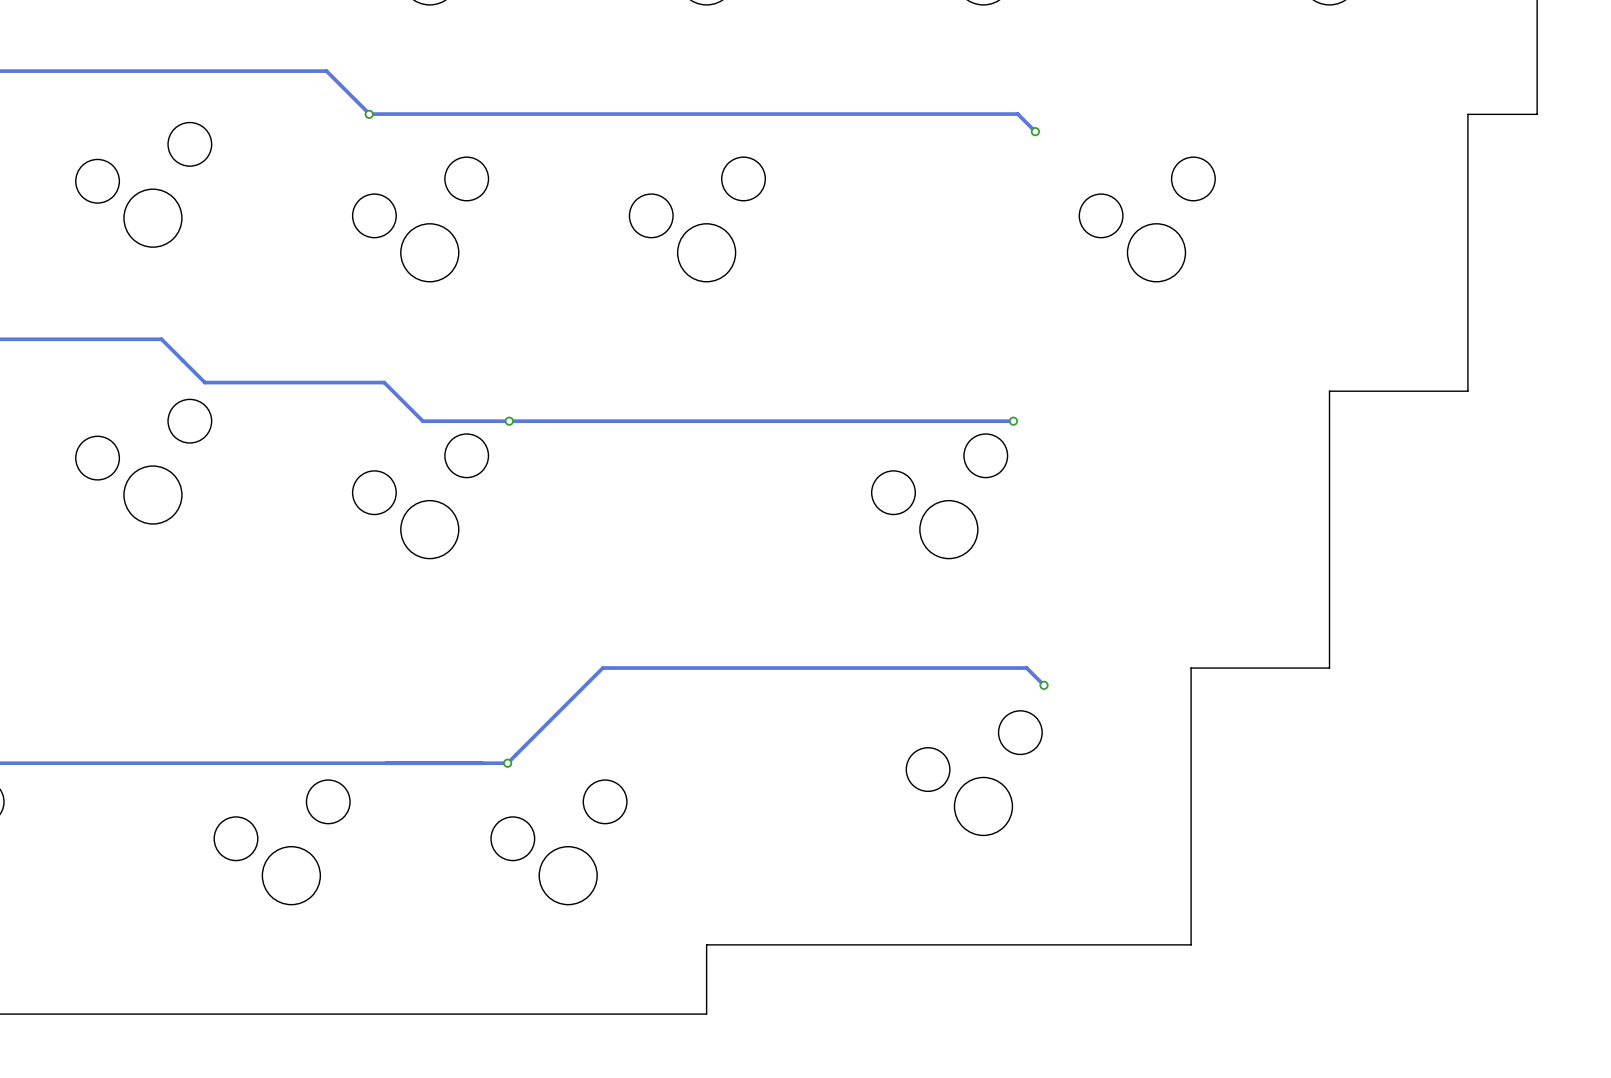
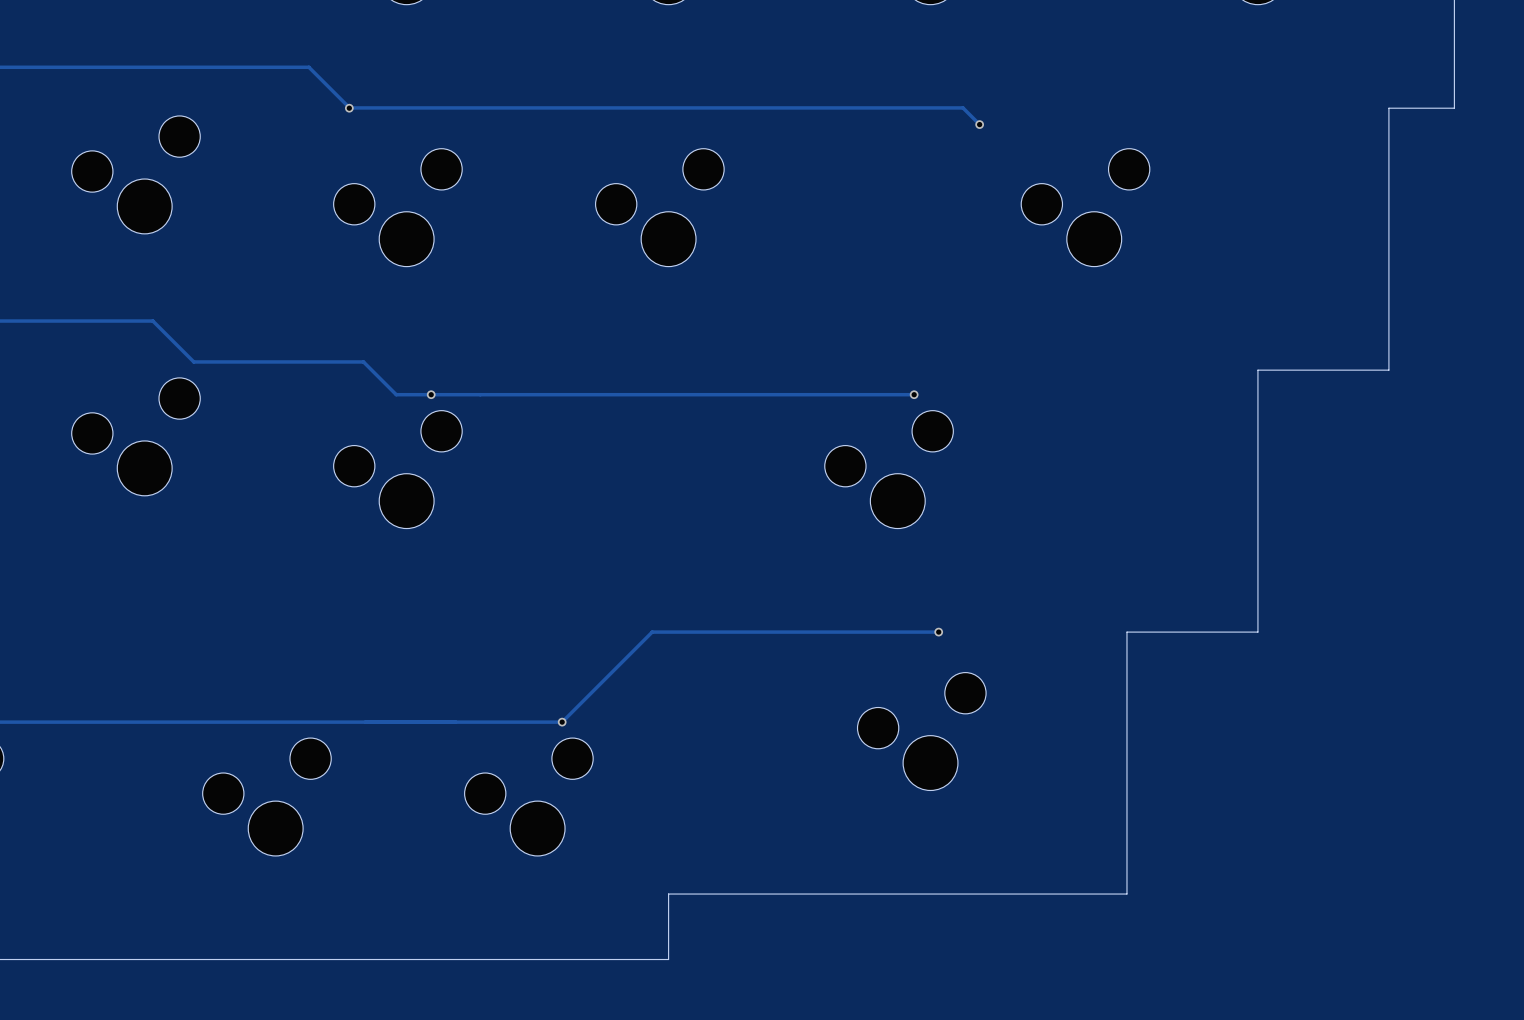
track: (418, 417) (422, 421) (1013, 421) -> (396, 394) (914, 394)
via position: (509, 421) -> (431, 394)
via position: (1013, 421) -> (914, 394)
track: (689, 668) (602, 668) (507, 763) -> (652, 632) (562, 722) (480, 722)
track: (992, 668) (1026, 668) (1044, 685) -> none
via position: (1044, 685) -> (938, 632)
via position: (507, 763) -> (562, 722)

